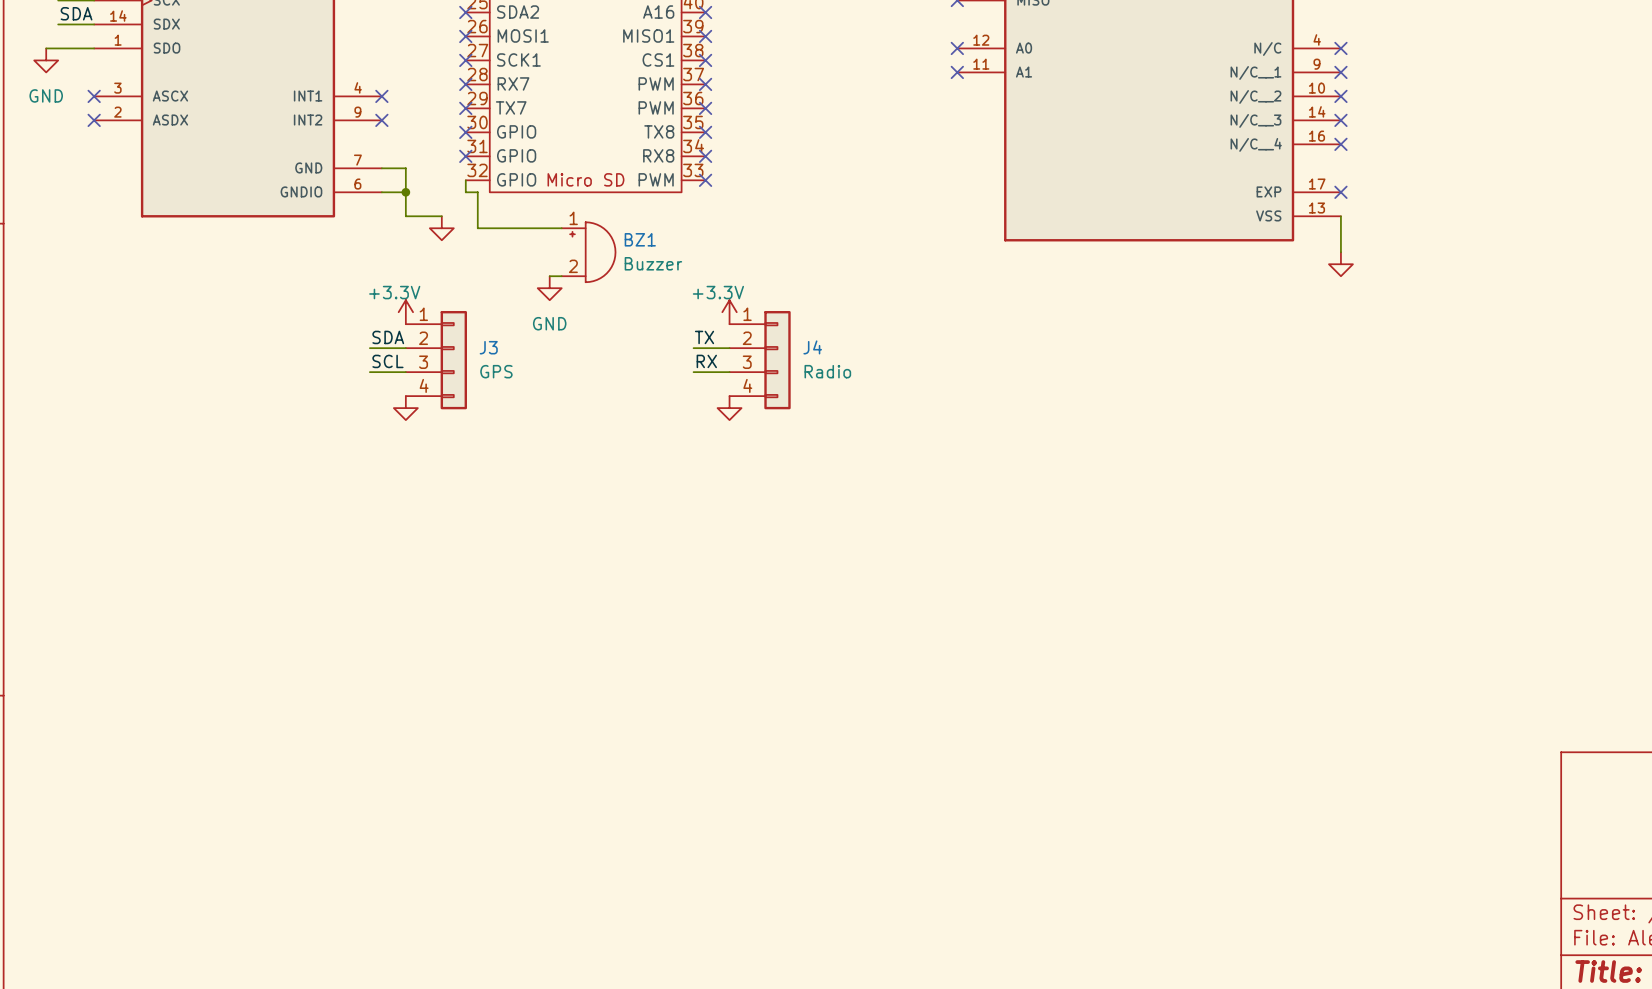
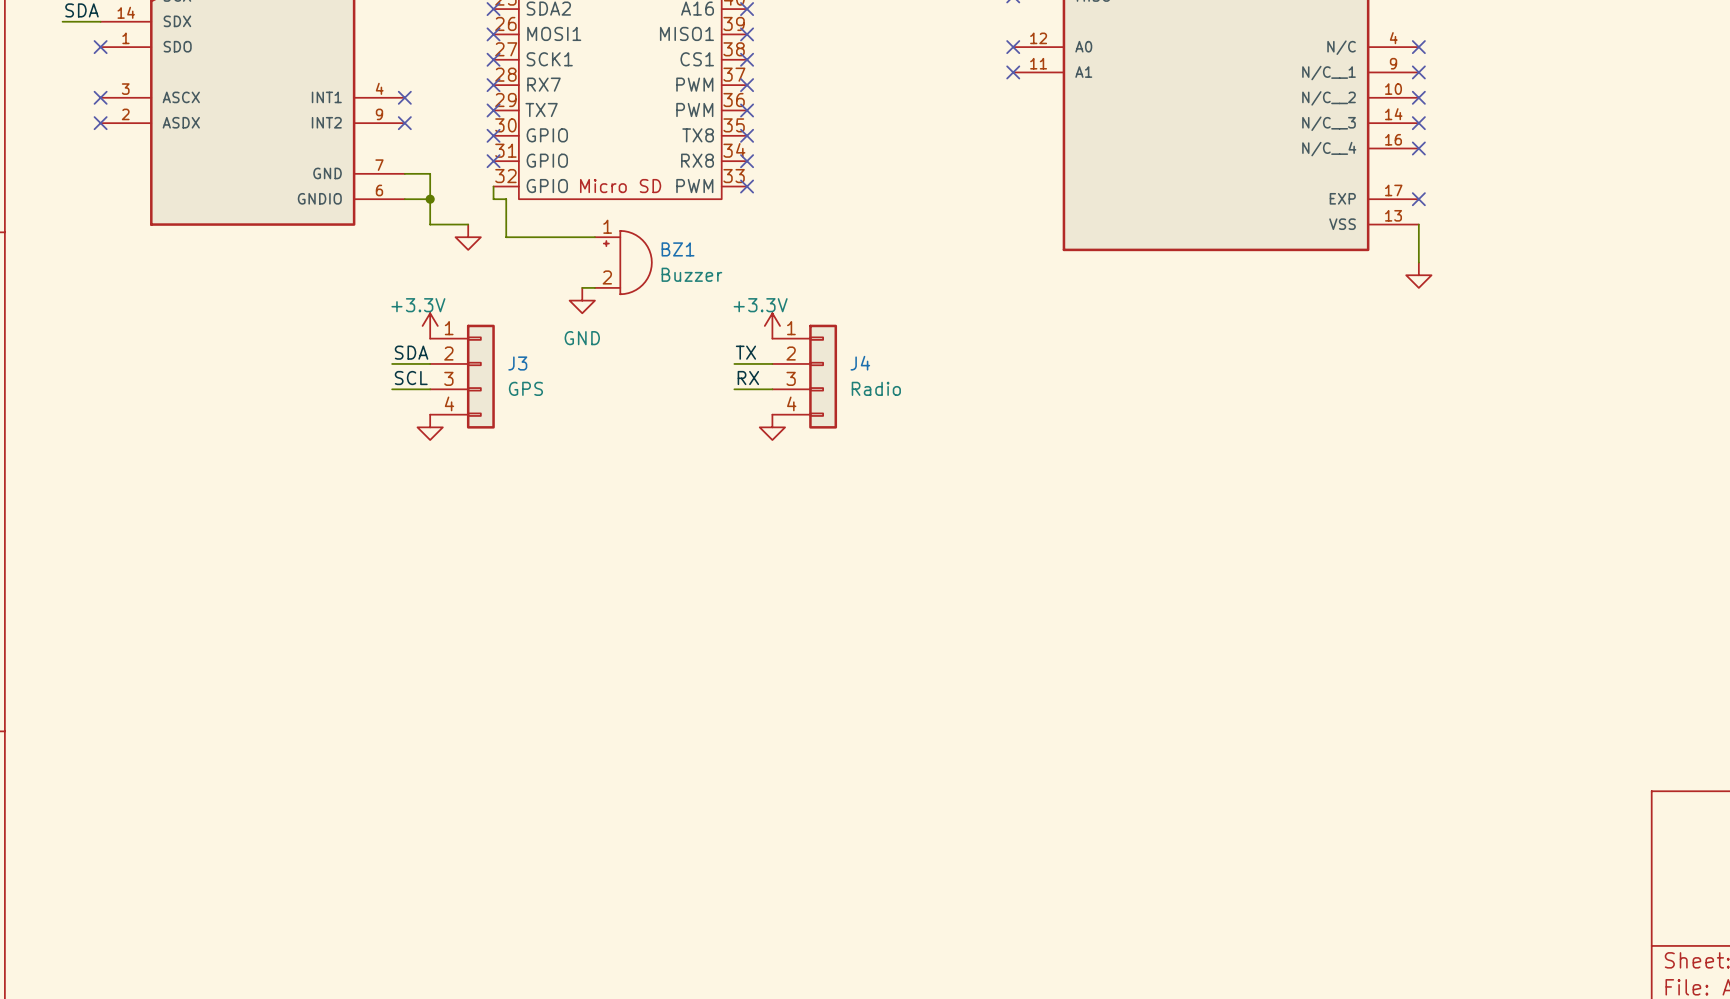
wire: (46, 48) (94, 48) -> none
no-connect mark: none -> (100, 47)
power symbol: GND (46, 60) -> none

